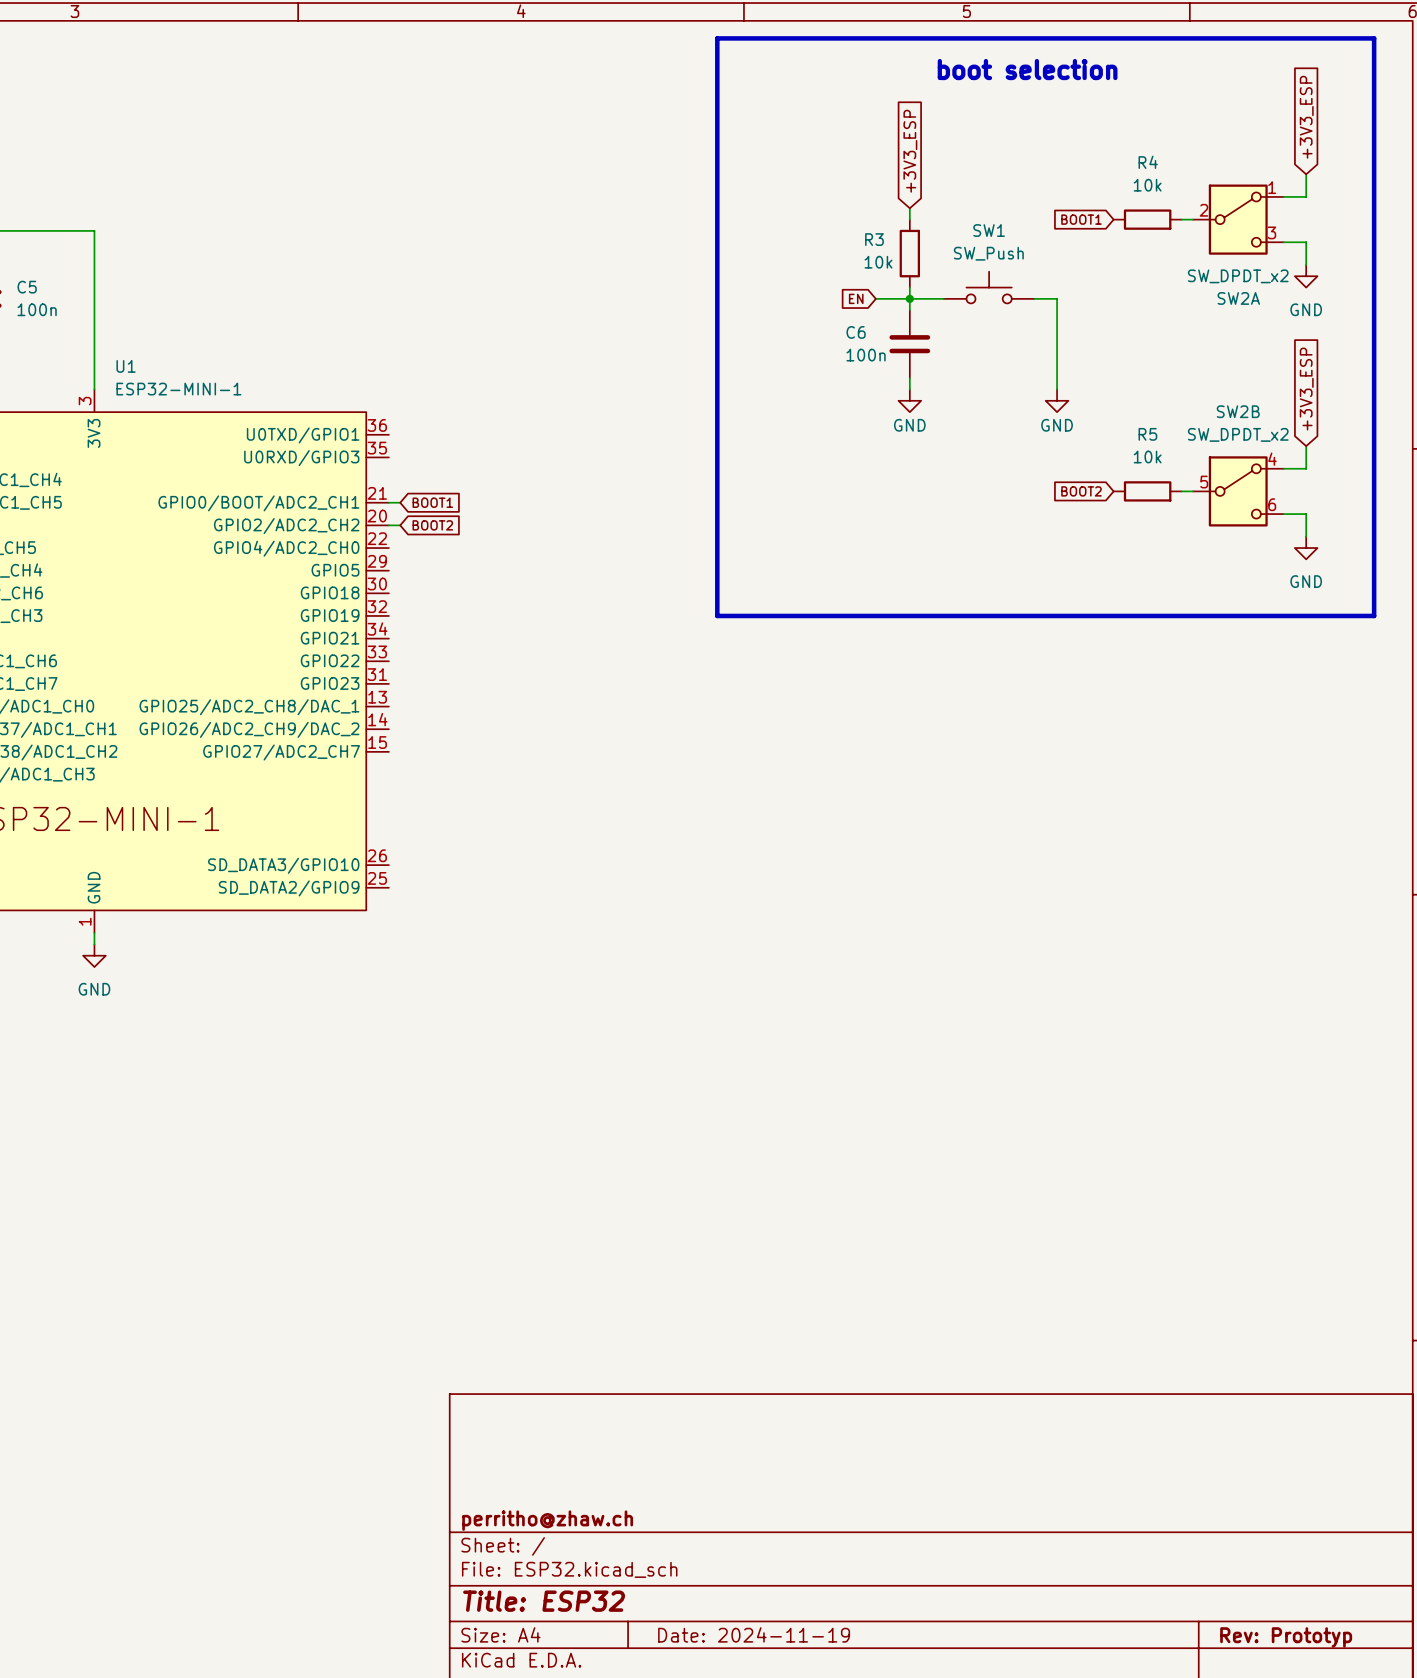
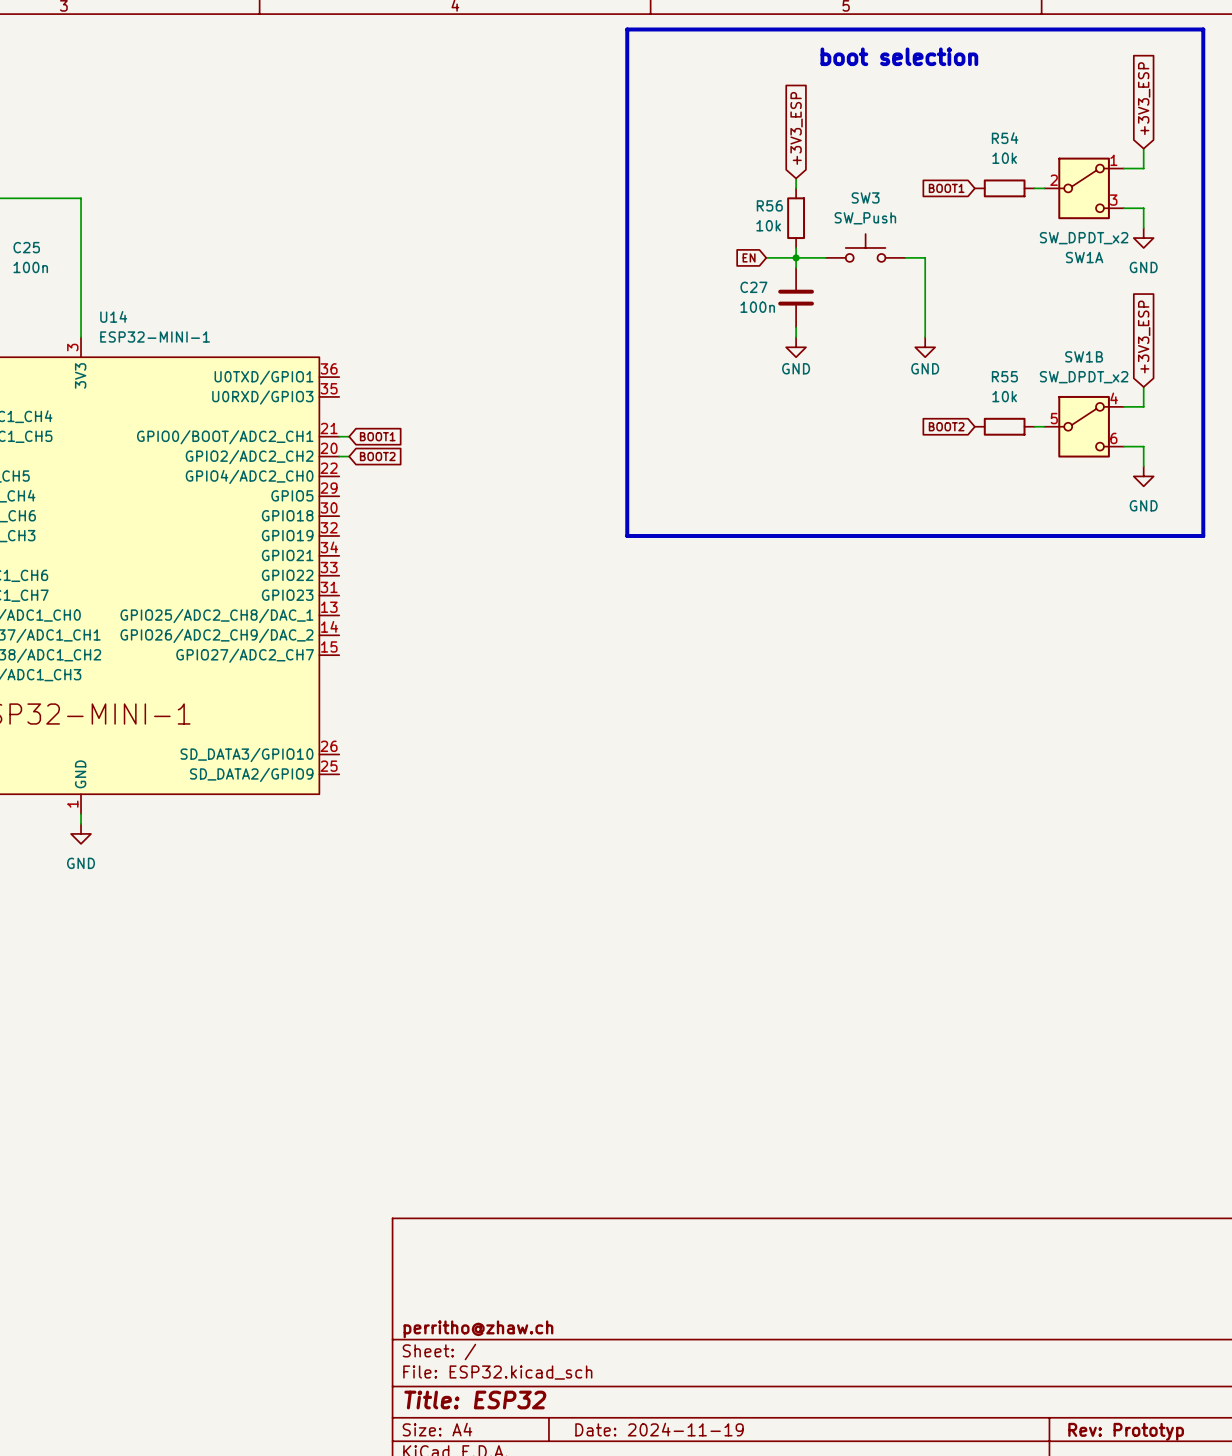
R4 name: R4 (1148, 162) -> R54 (1005, 138)
SW1 name: SW1 (989, 230) -> SW3 (865, 197)
R3 name: R3 (874, 239) -> R56 (769, 205)
C5 name: C5 (27, 287) -> C25 (26, 247)
SW2A name: SW2A (1238, 298) -> SW1A (1084, 257)
C6 name: C6 (856, 332) -> C27 (753, 287)
U1 name: U1 (126, 366) -> U14 (113, 316)
SW2B name: SW2B (1238, 411) -> SW1B (1084, 356)
R5 name: R5 (1147, 434) -> R55 (1004, 376)

